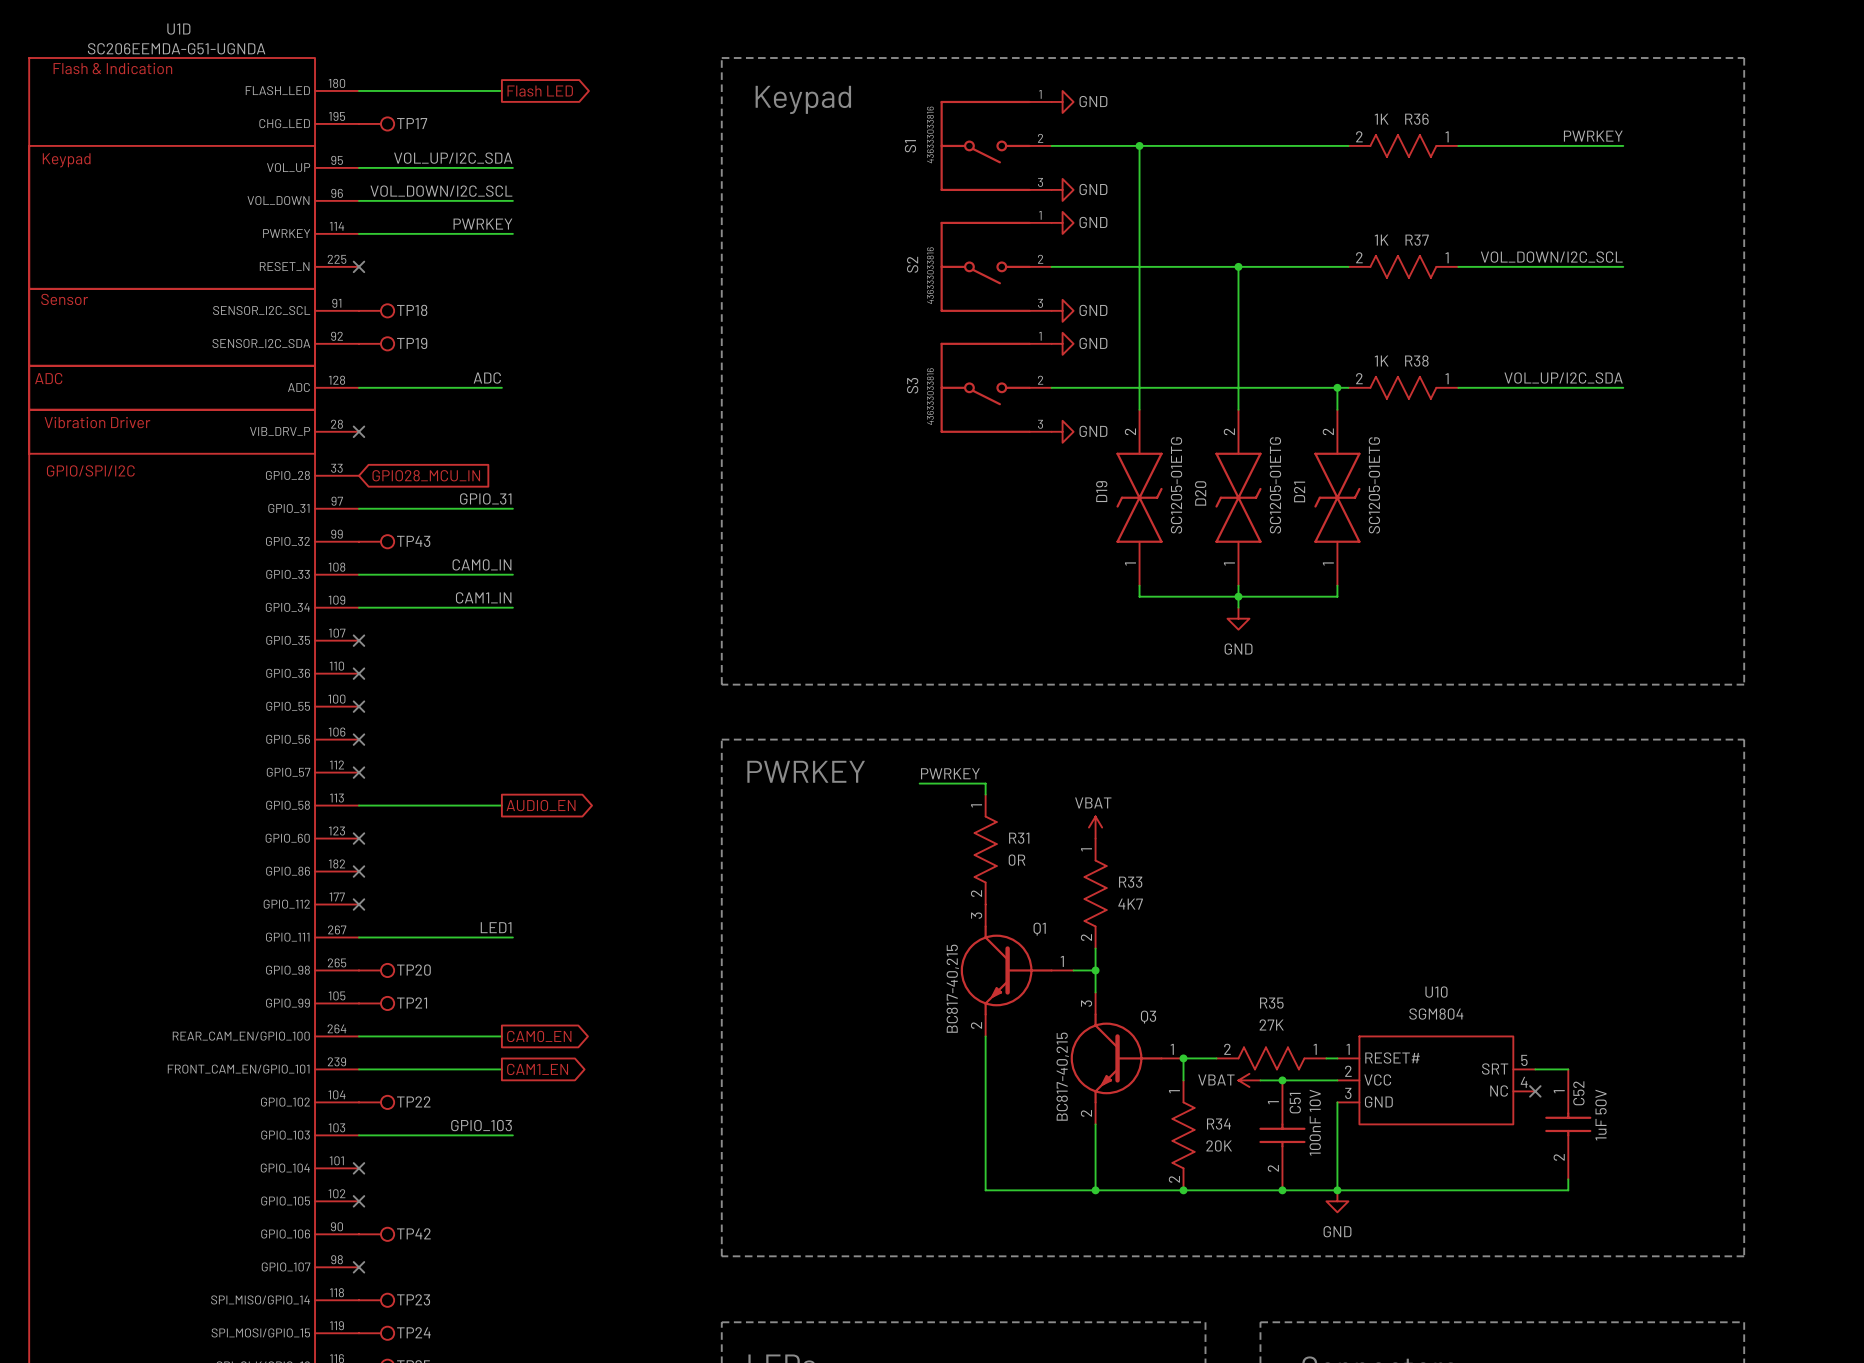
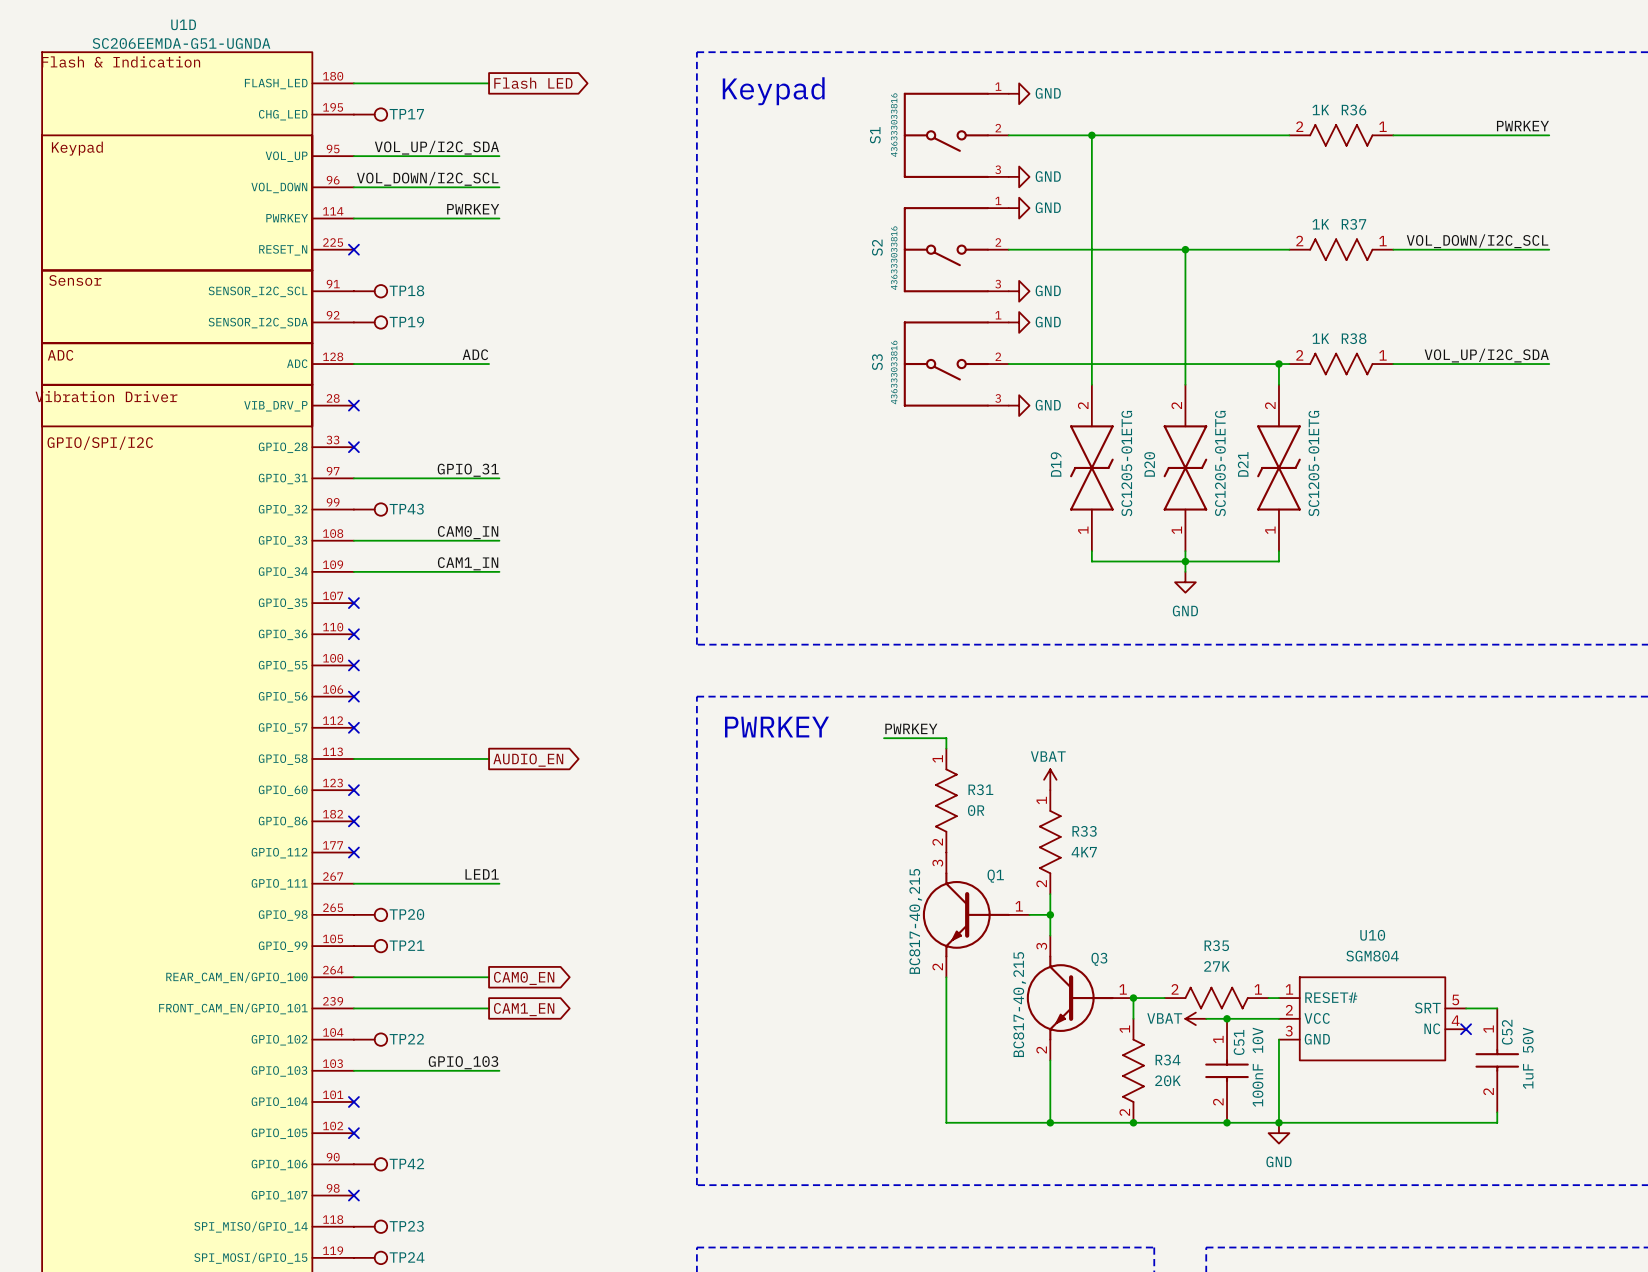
no-connect mark: none -> (353, 447)
global label: GPIO28_MCU_IN (426, 475) -> none

